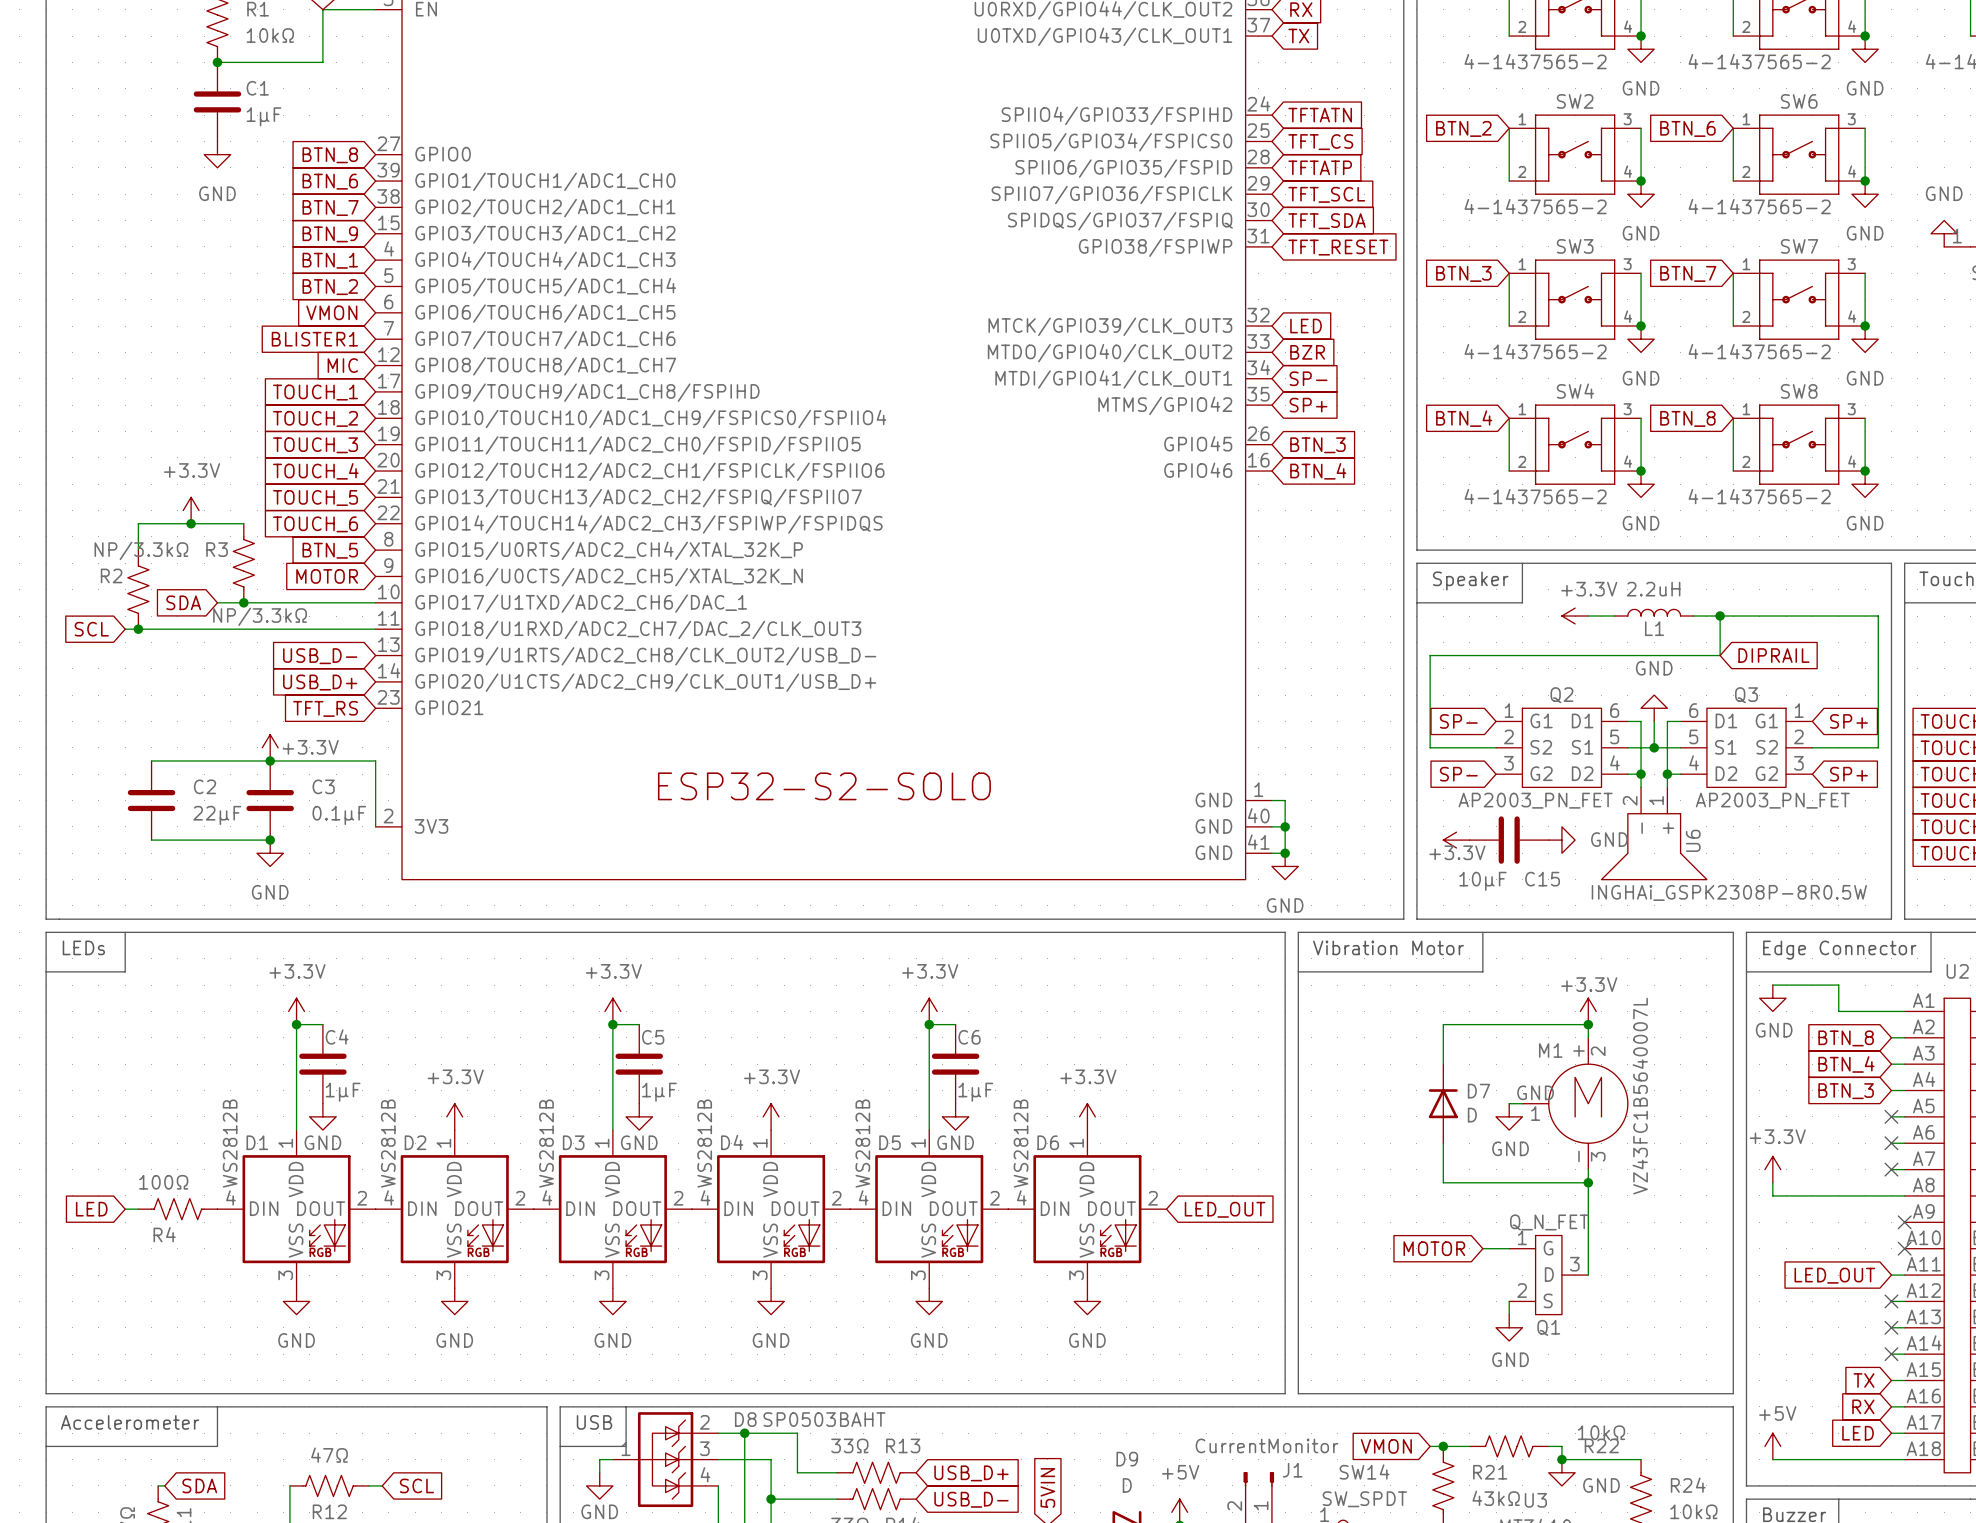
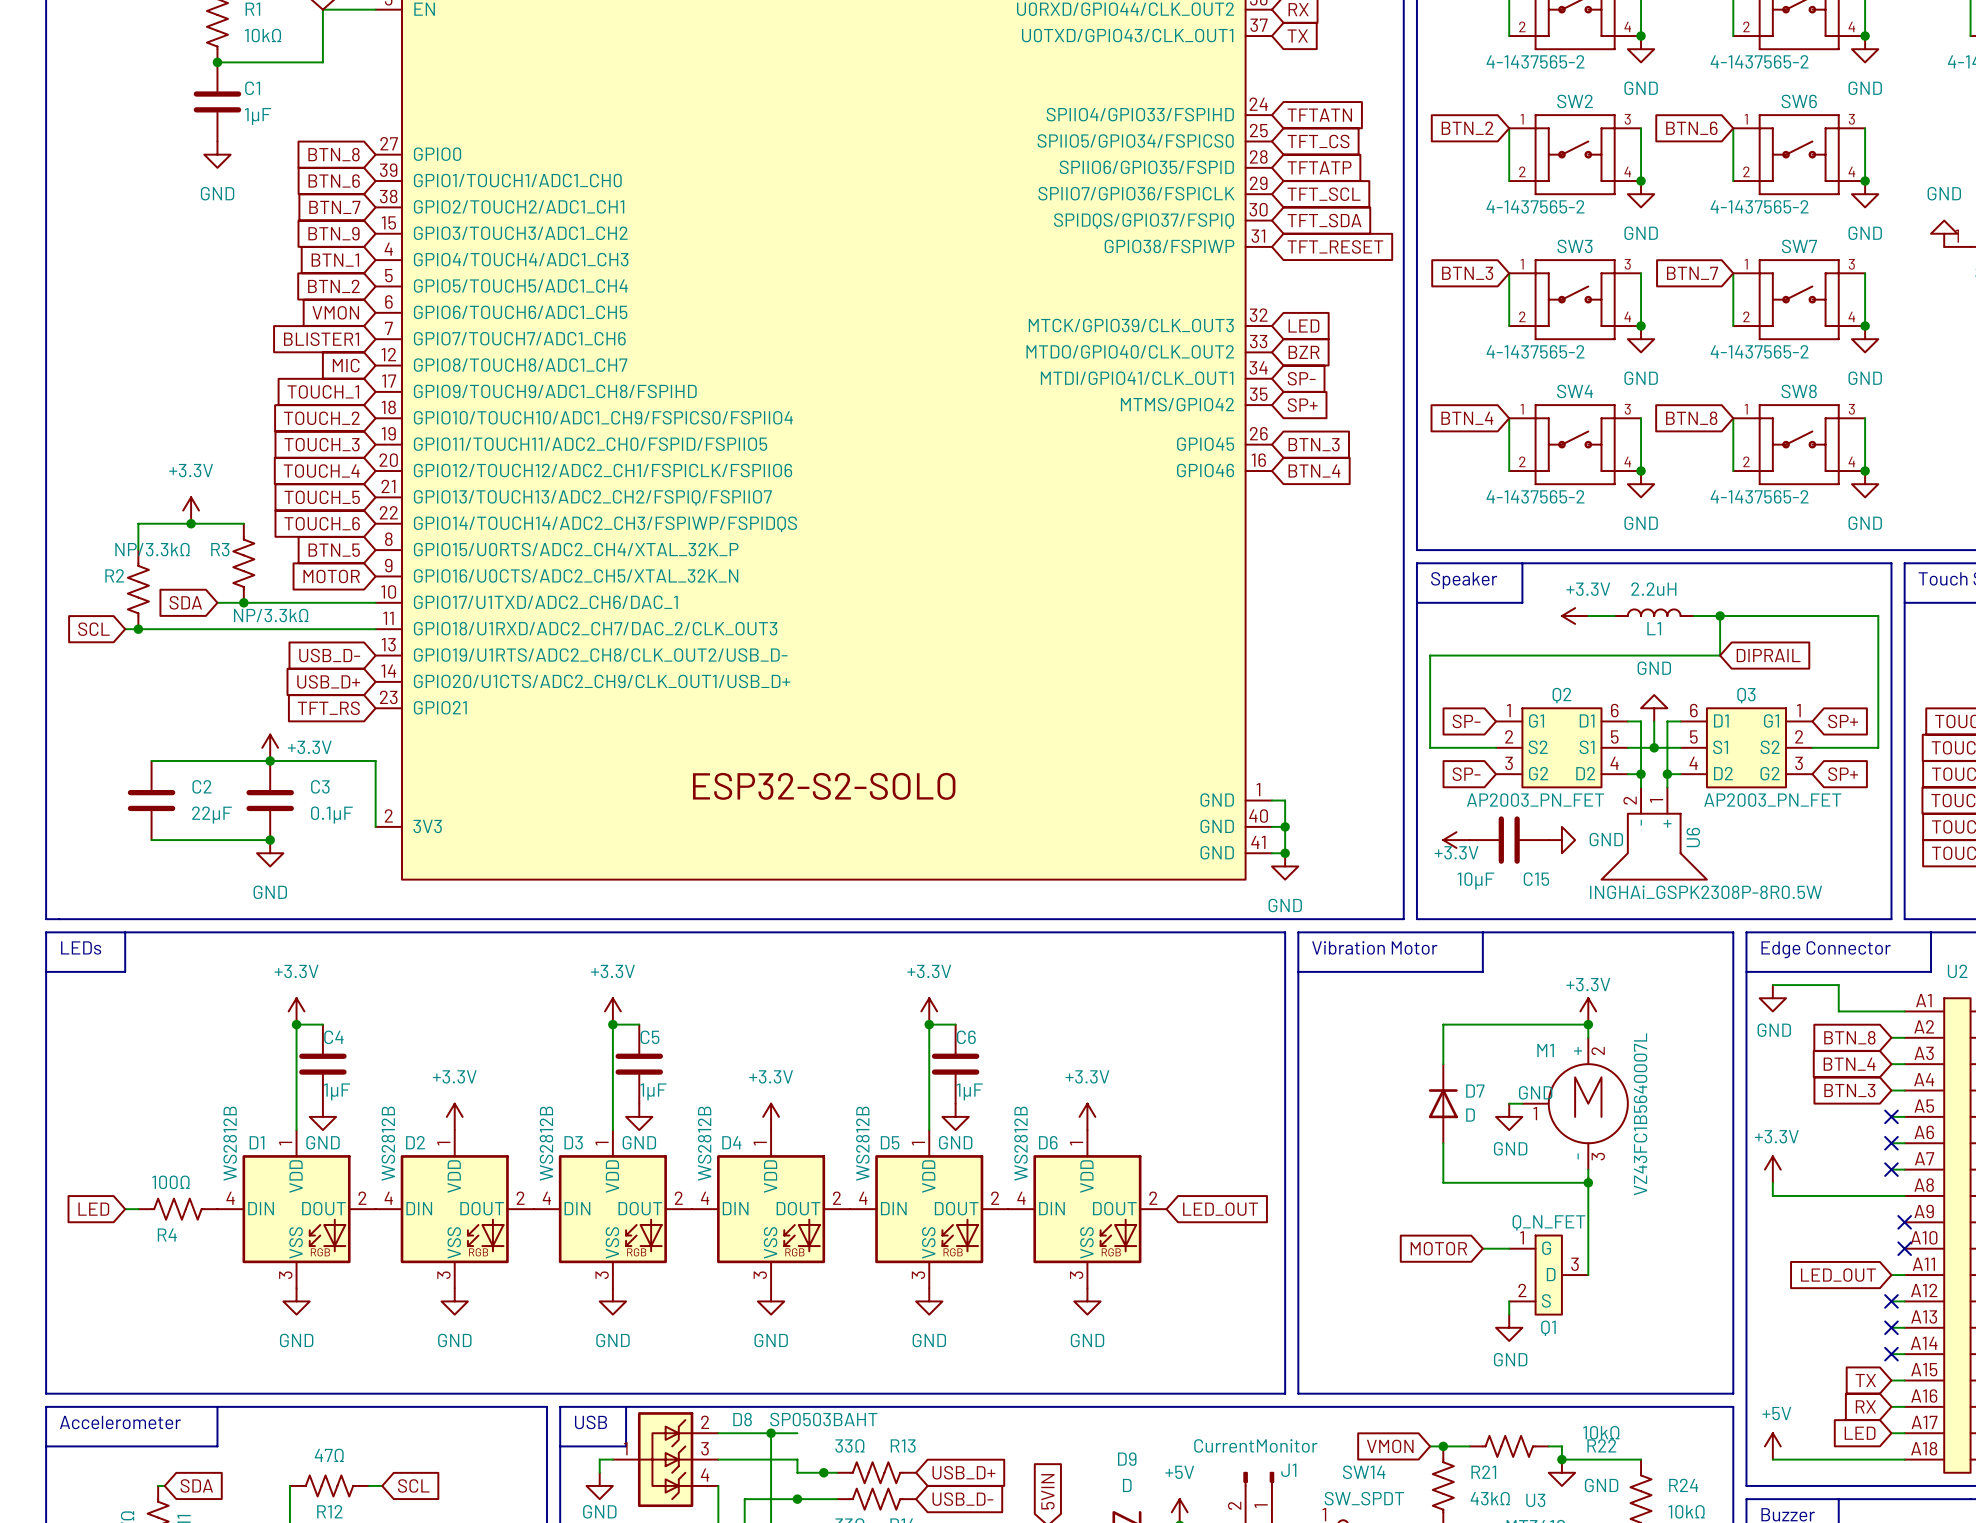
wire: (744, 1433) (744, 1499) -> (771, 1499) (744, 1499)
junction position: (744, 1433) -> (771, 1433)
wire: (797, 1433) (797, 1459) -> (771, 1433) (771, 1459) (797, 1459)
junction: none -> (823, 1472)
junction position: (771, 1499) -> (797, 1499)

